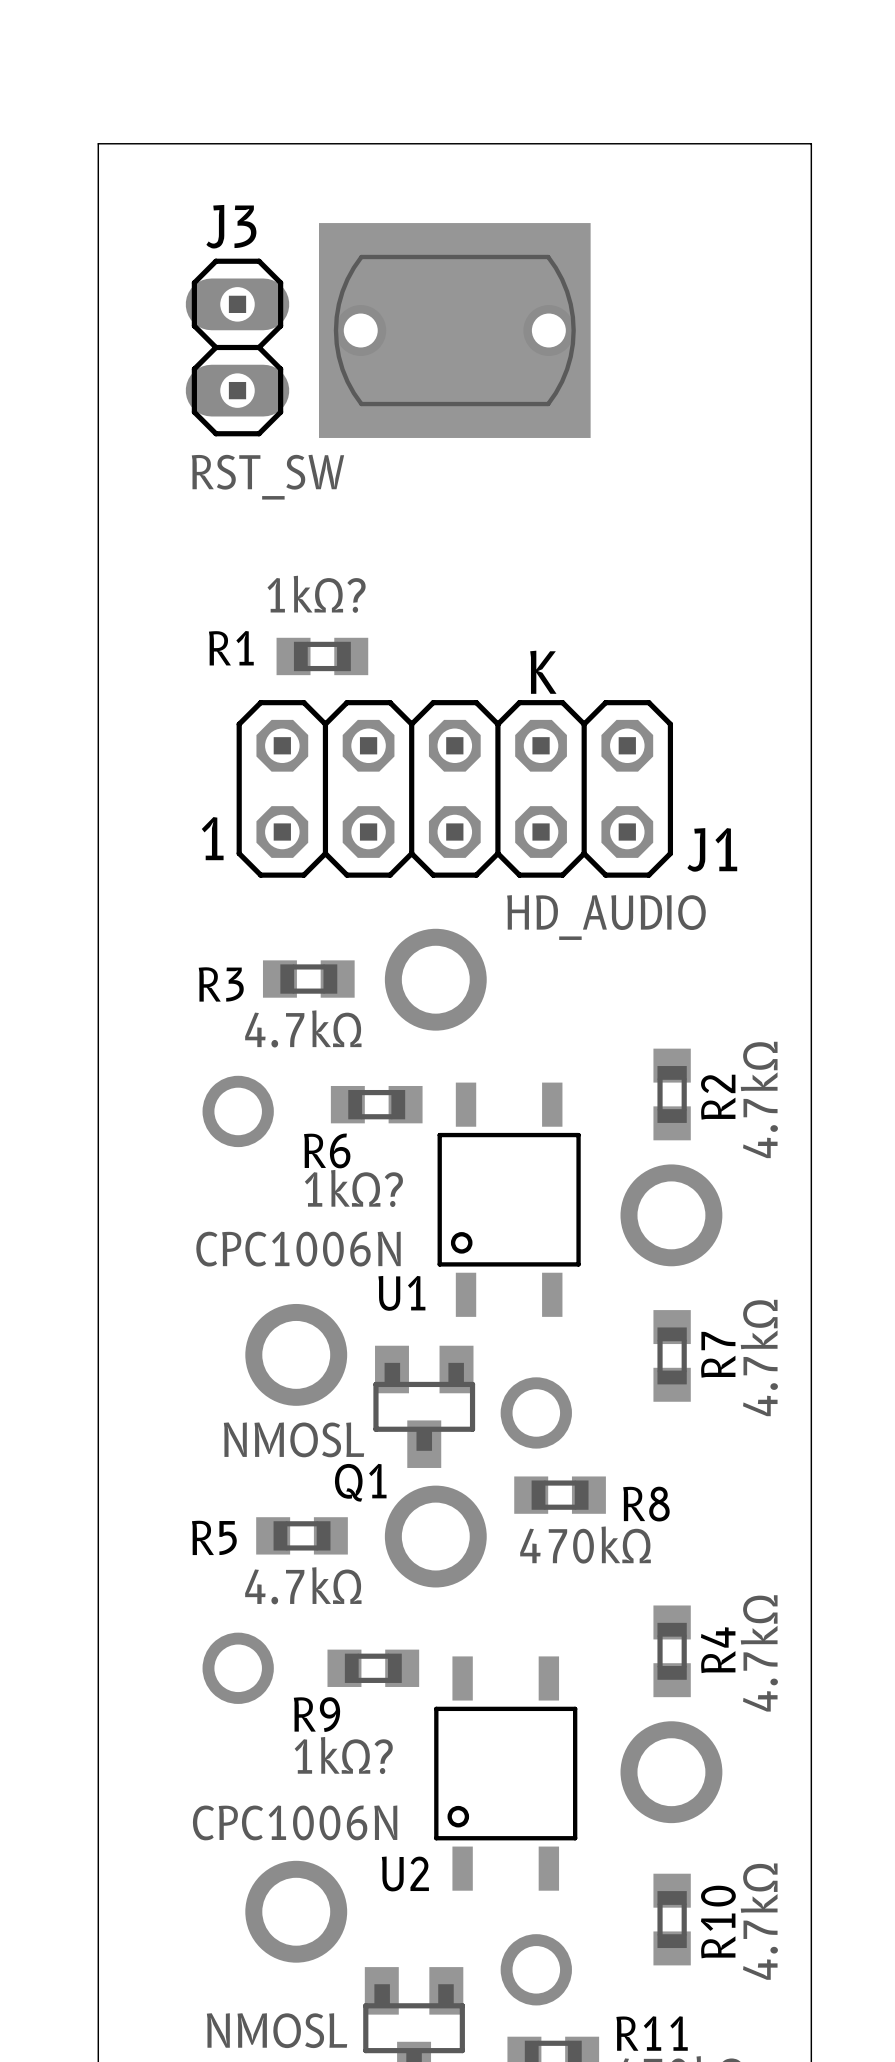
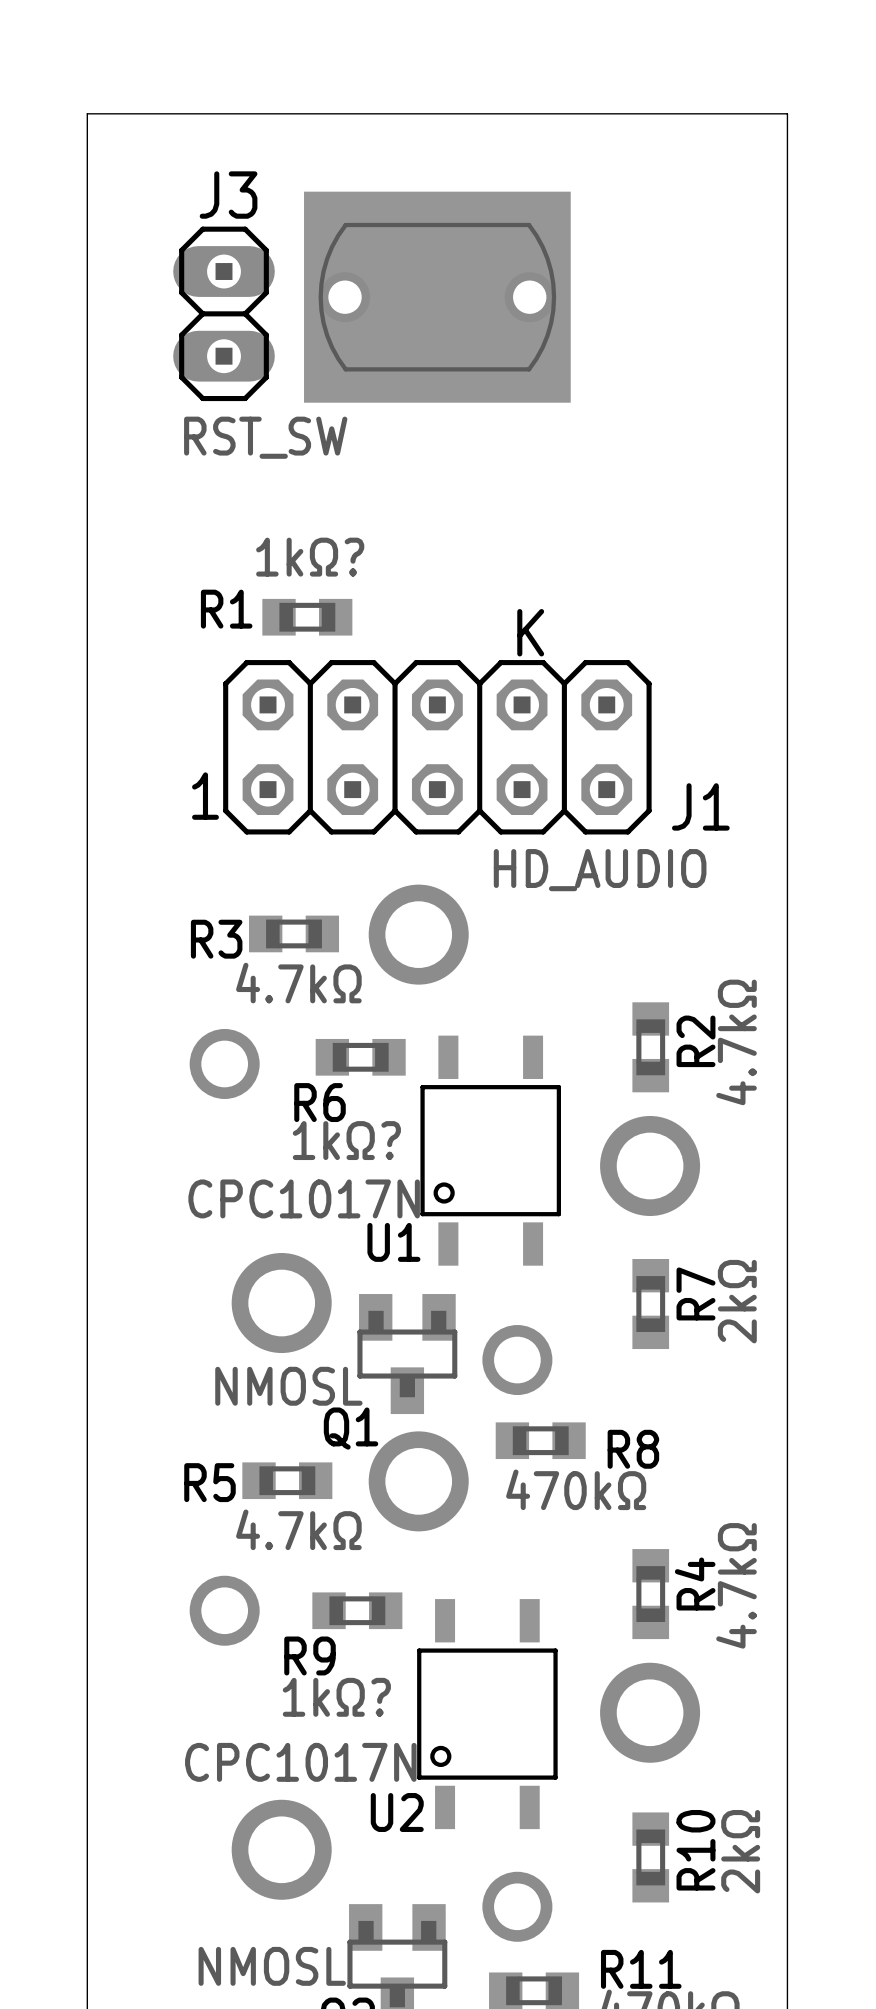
U1 value: CPC1006N (298, 1249) -> CPC1017N (304, 1198)
R7 value: 4.7kΩ (759, 1358) -> 2kΩ (737, 1301)
U2 value: CPC1006N (295, 1822) -> CPC1017N (300, 1762)
R10 value: 4.7kΩ (759, 1921) -> 2kΩ (740, 1851)

